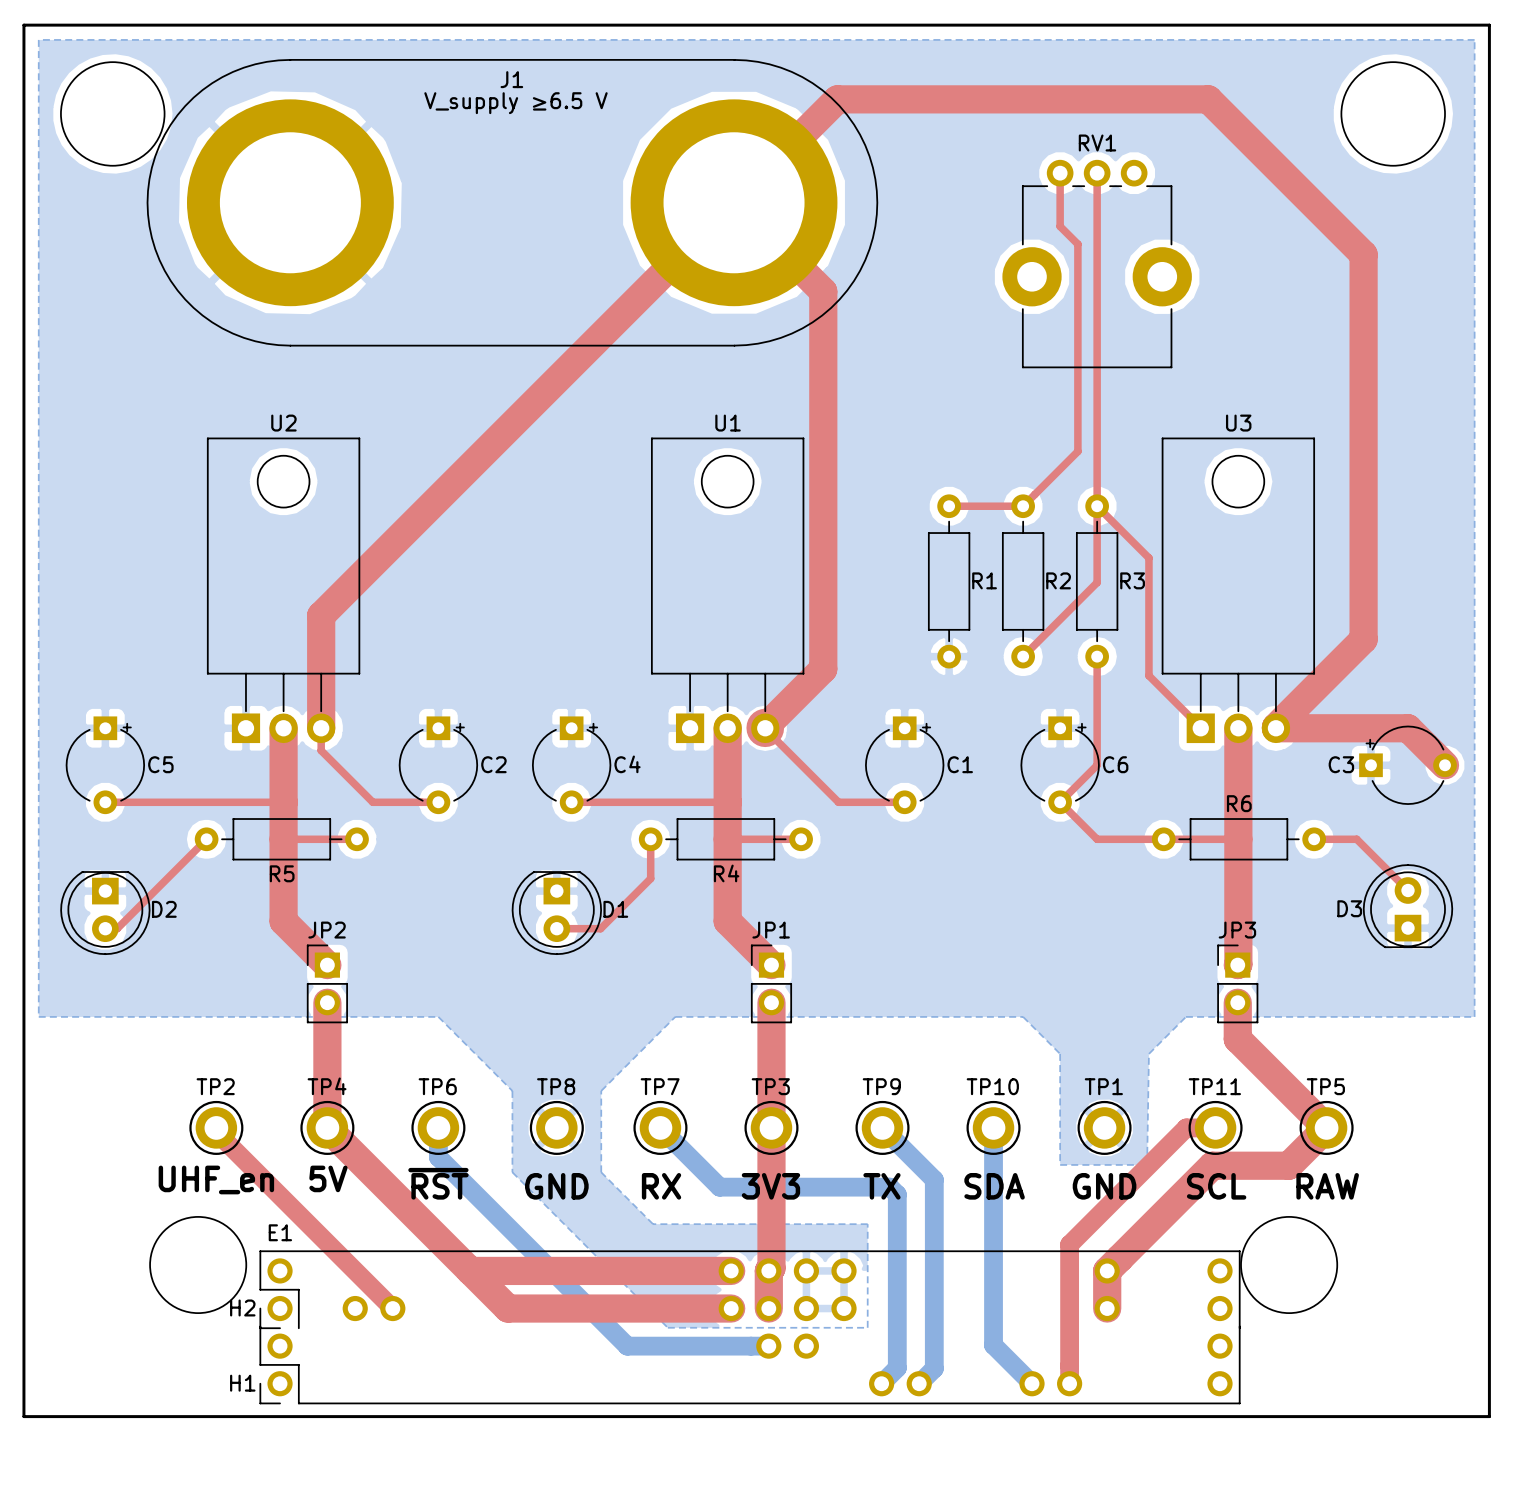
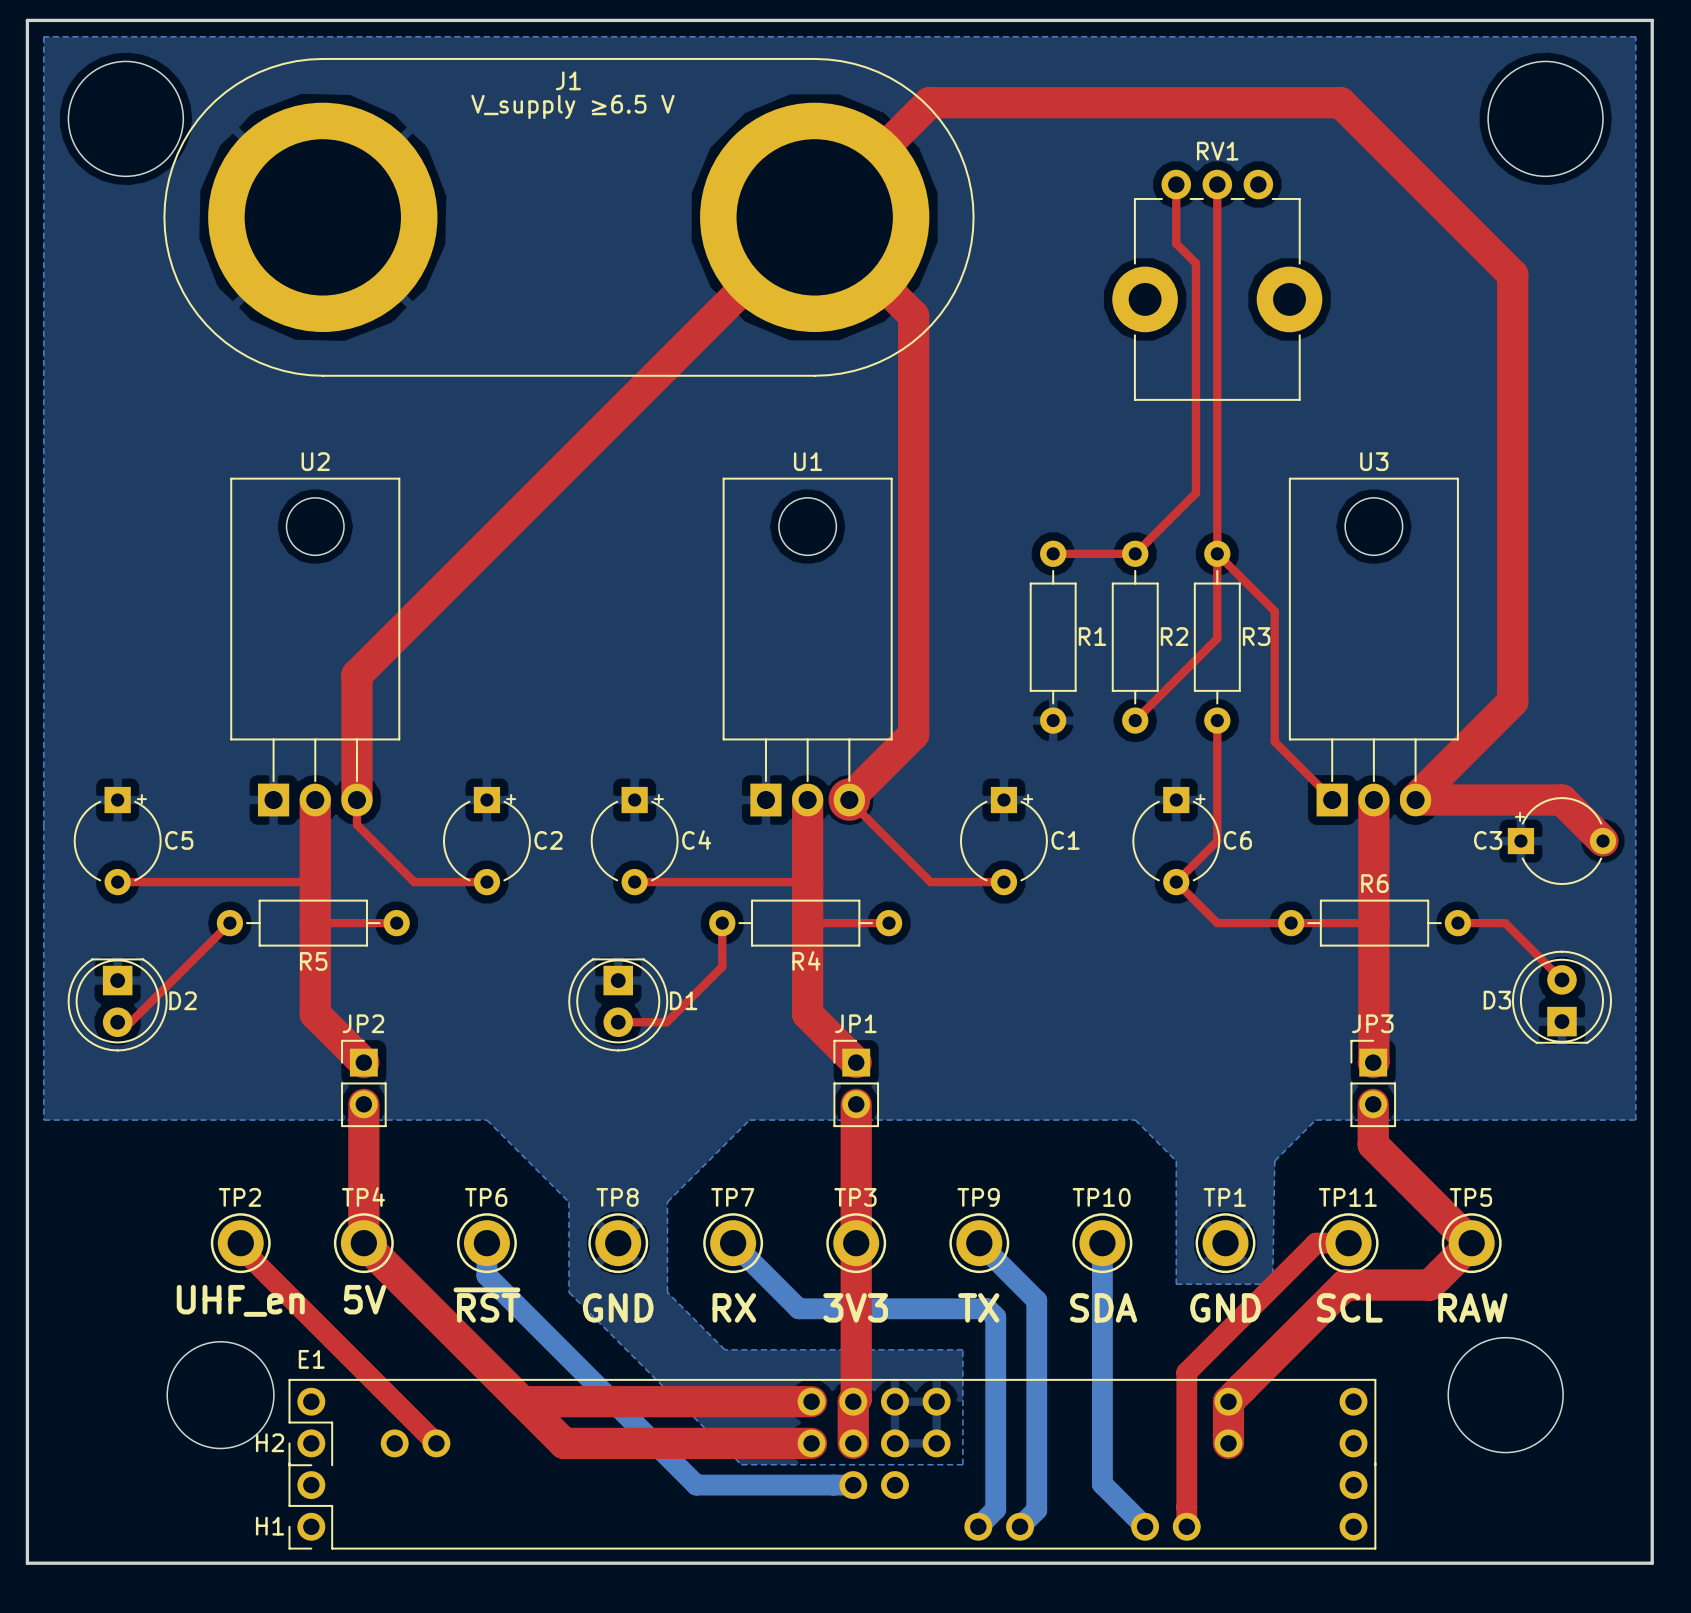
round board edge: none -> [1448, 1337, 1564, 1453]
round board edge: [1240, 1216, 1338, 1314] -> none

